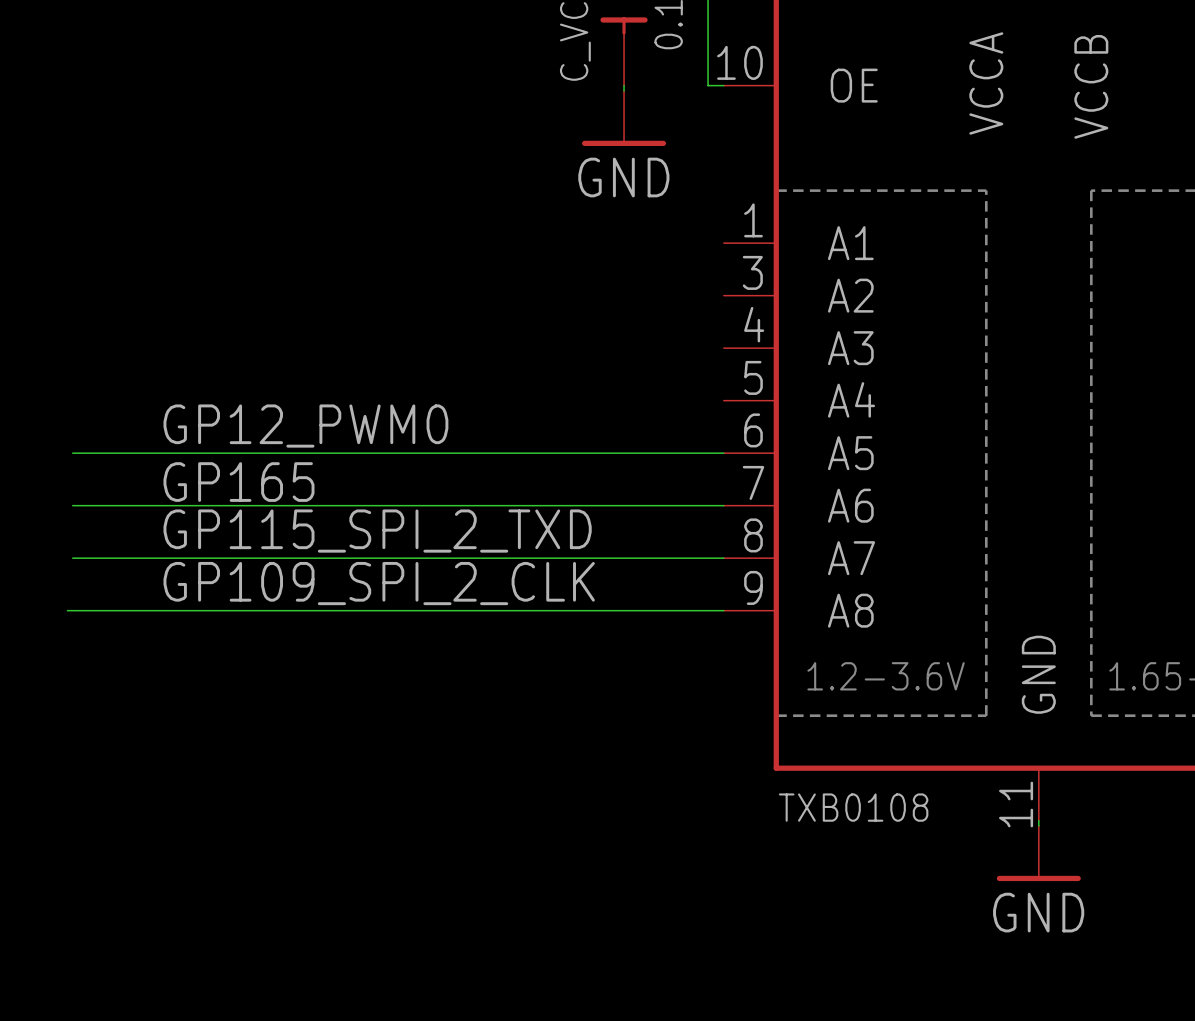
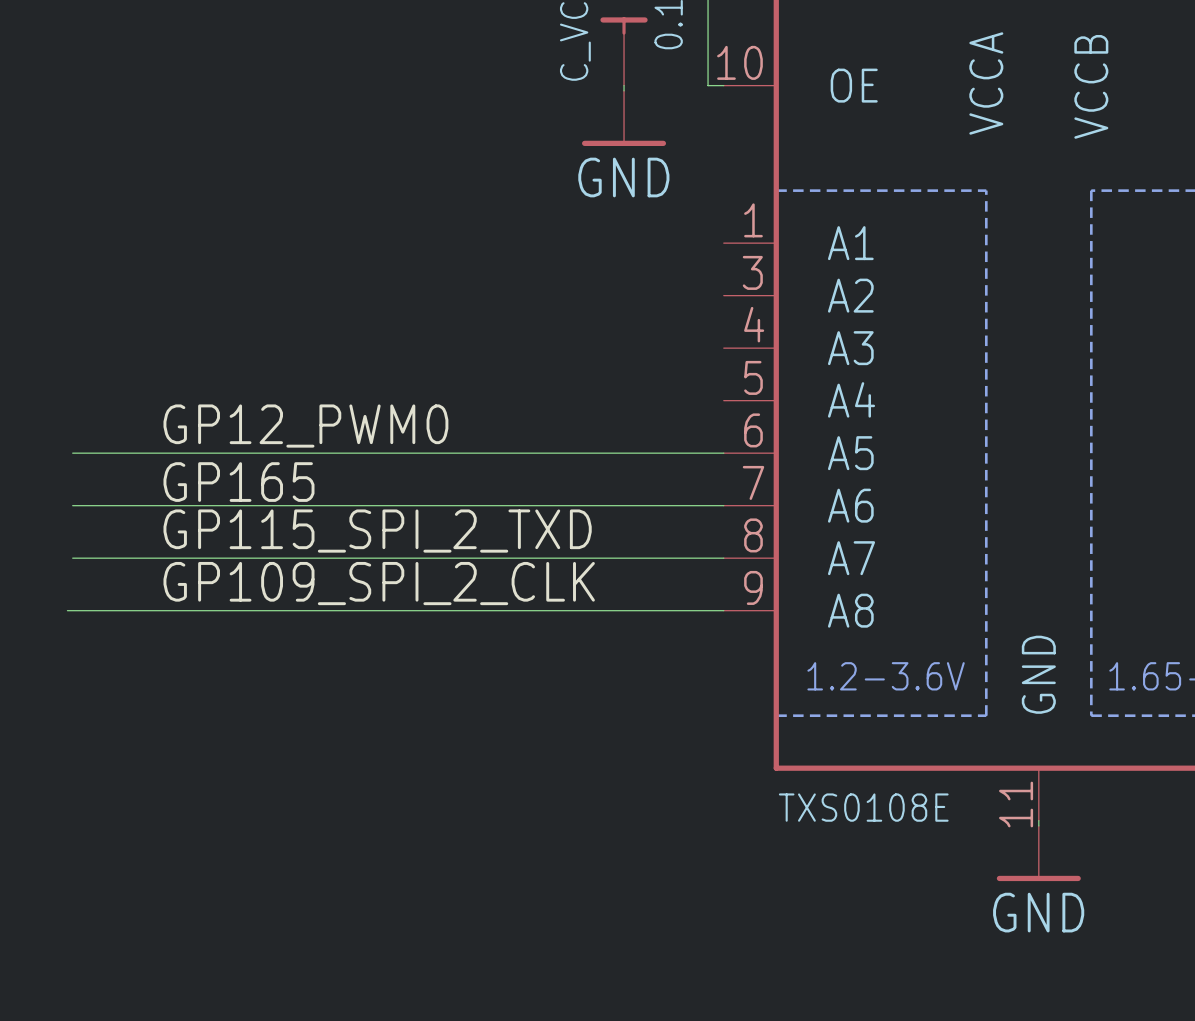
part value: TXB0108 (853, 807) -> TXS0108E (863, 807)

